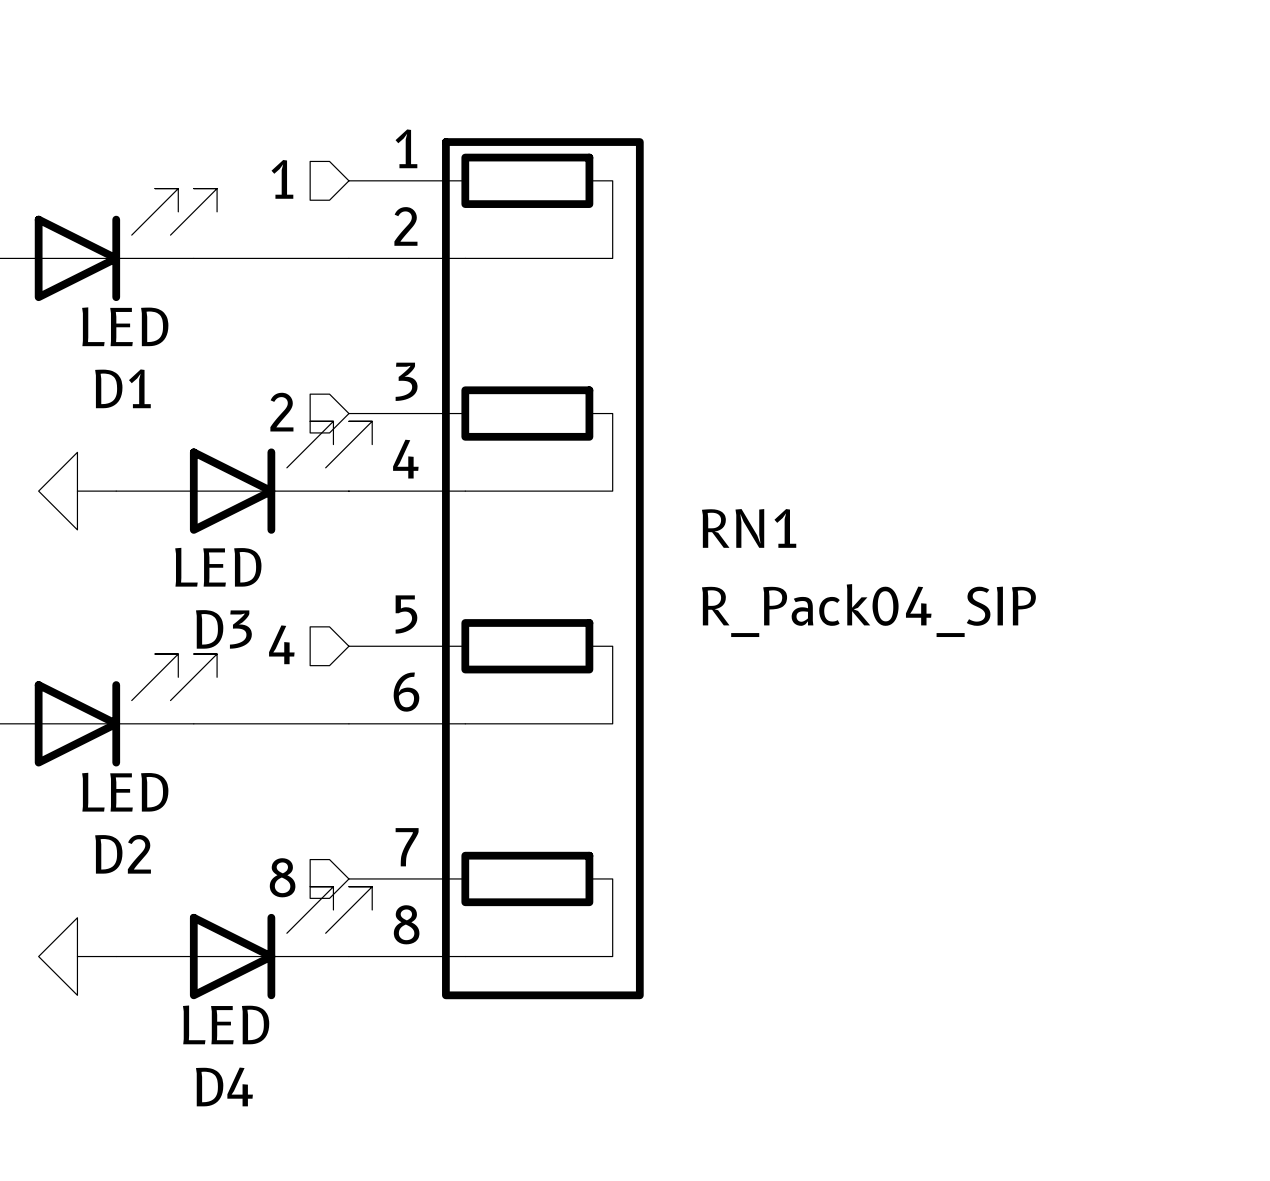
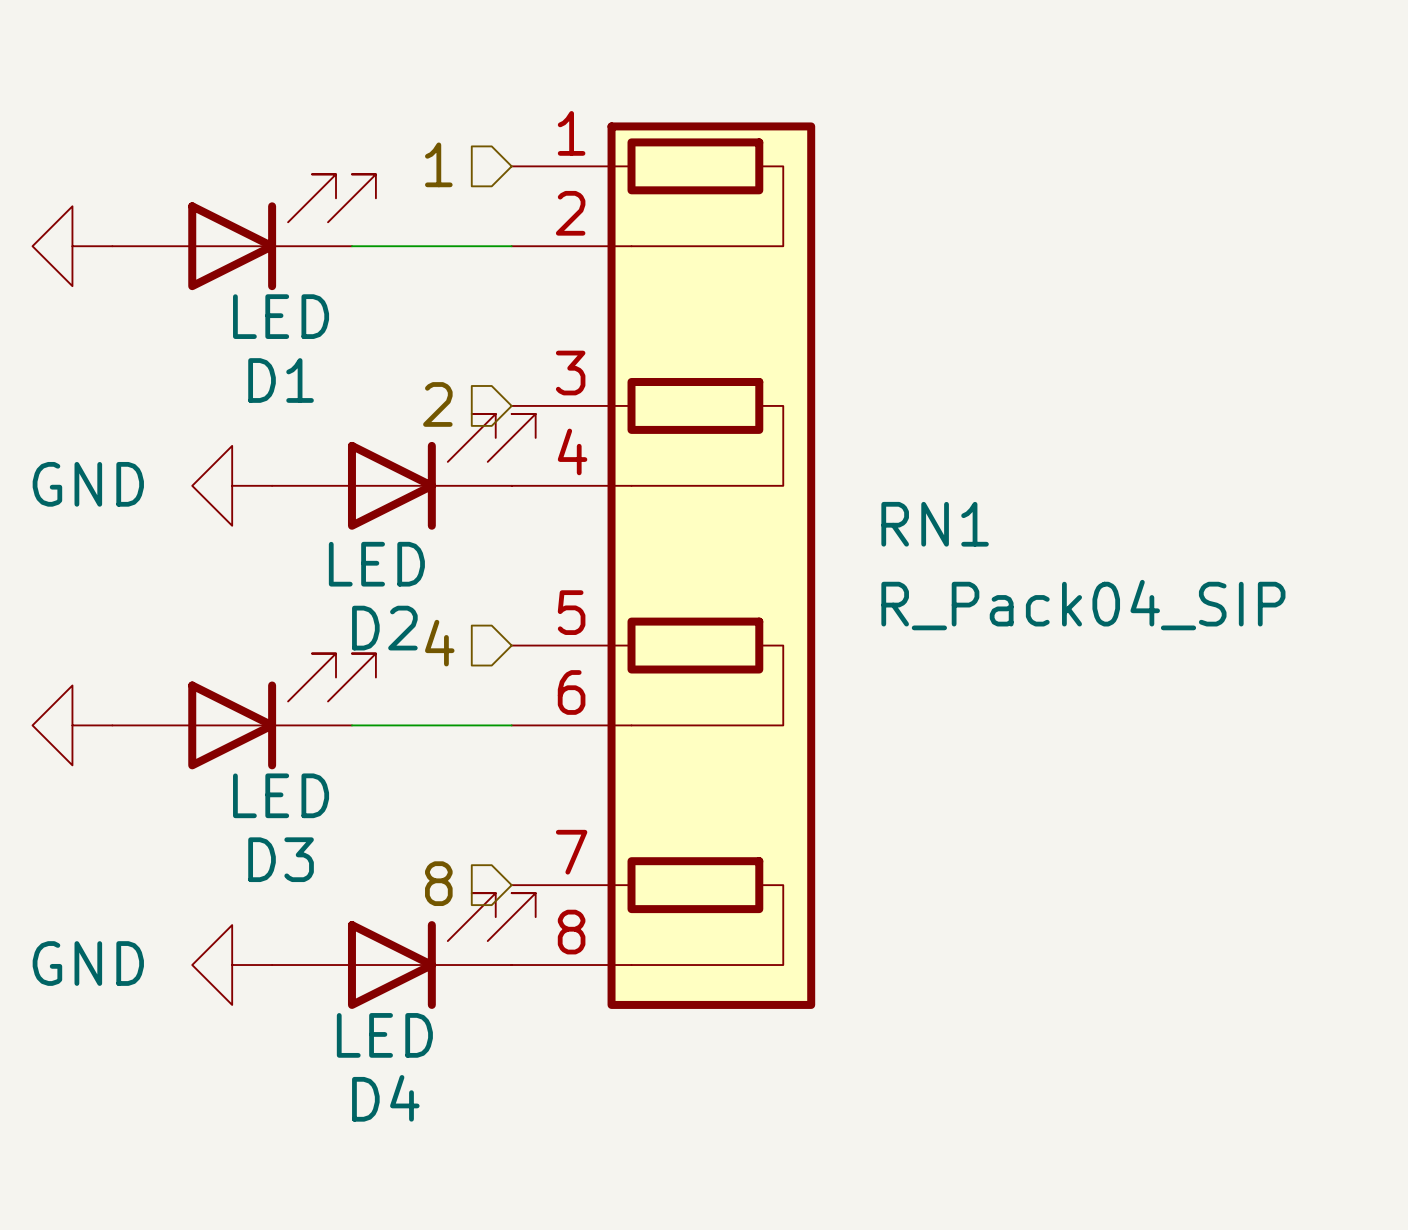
D3 name: D3 (223, 629) -> D2 (384, 628)
D2 name: D2 (123, 854) -> D3 (281, 859)

